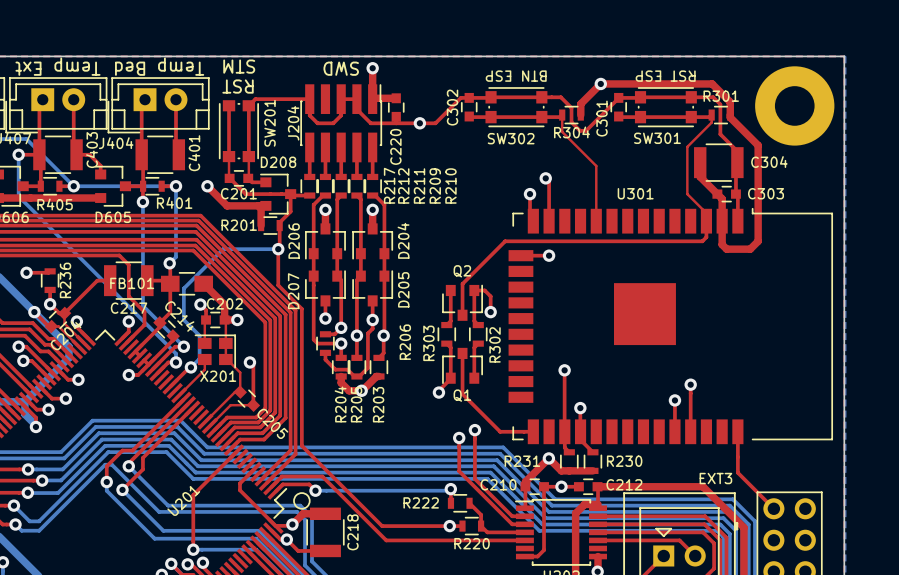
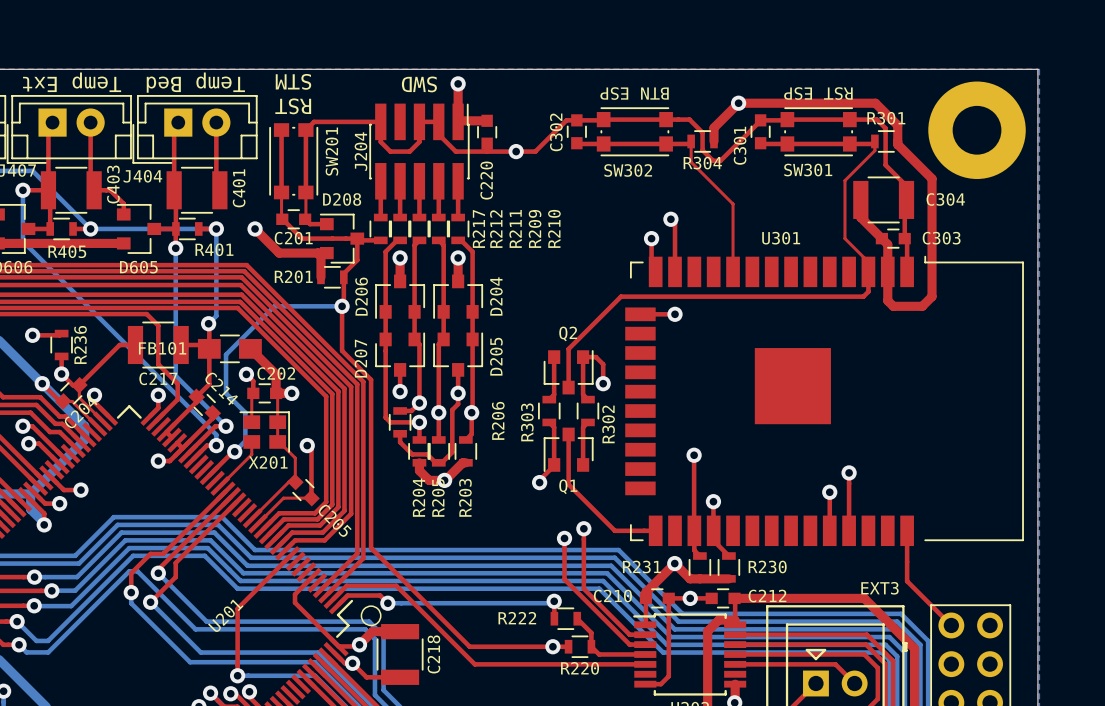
top track: (57, 369) (68, 379) (78, 379) -> none
via: (78, 379) -> none

